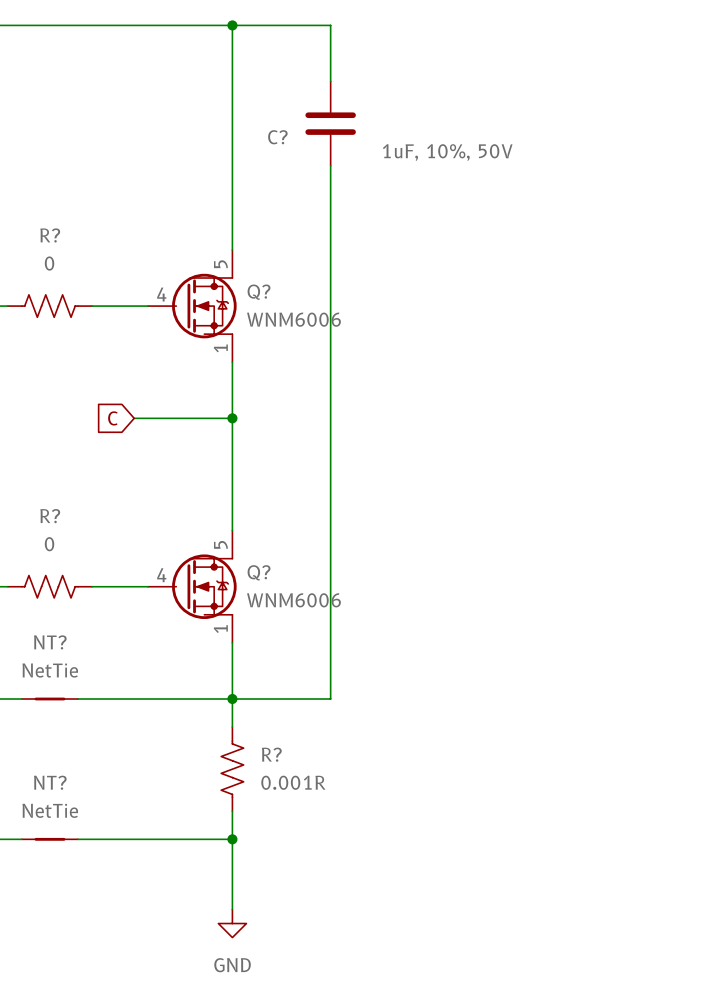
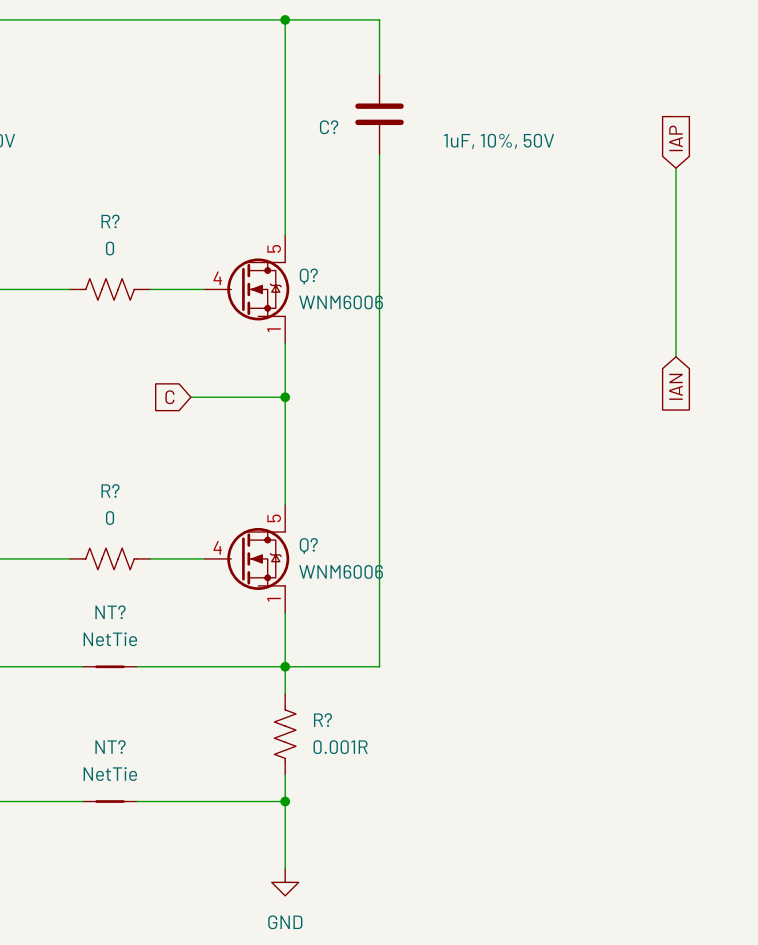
global label: none -> IAP (675, 138)
wire: none -> (675, 168) (675, 356)
global label: none -> IAN (675, 386)

